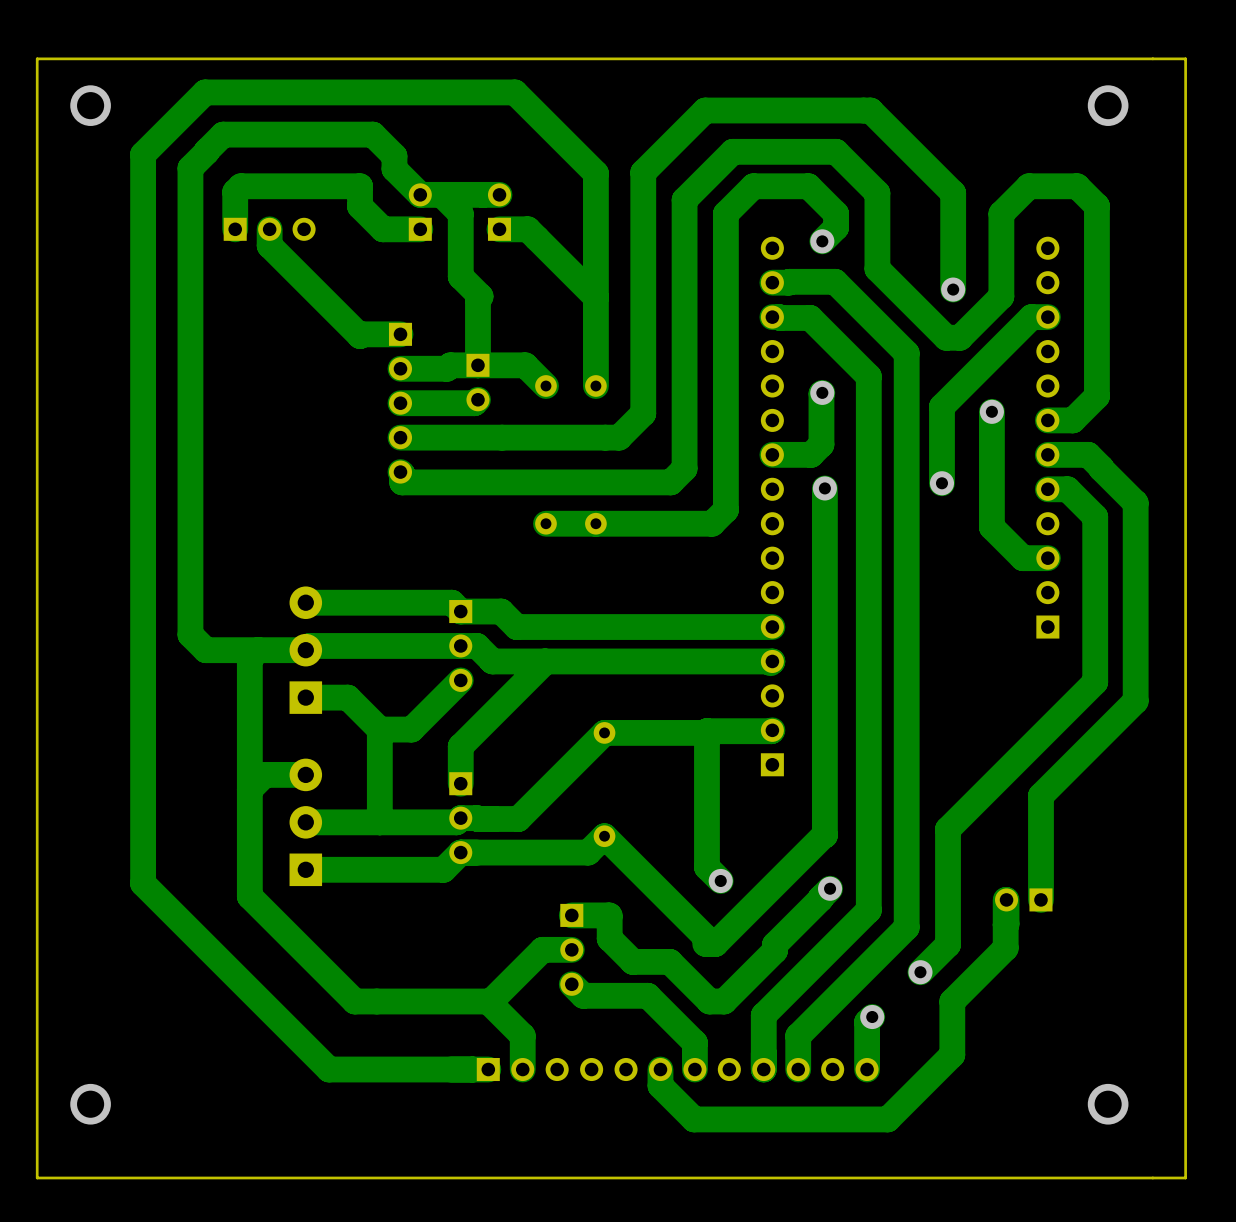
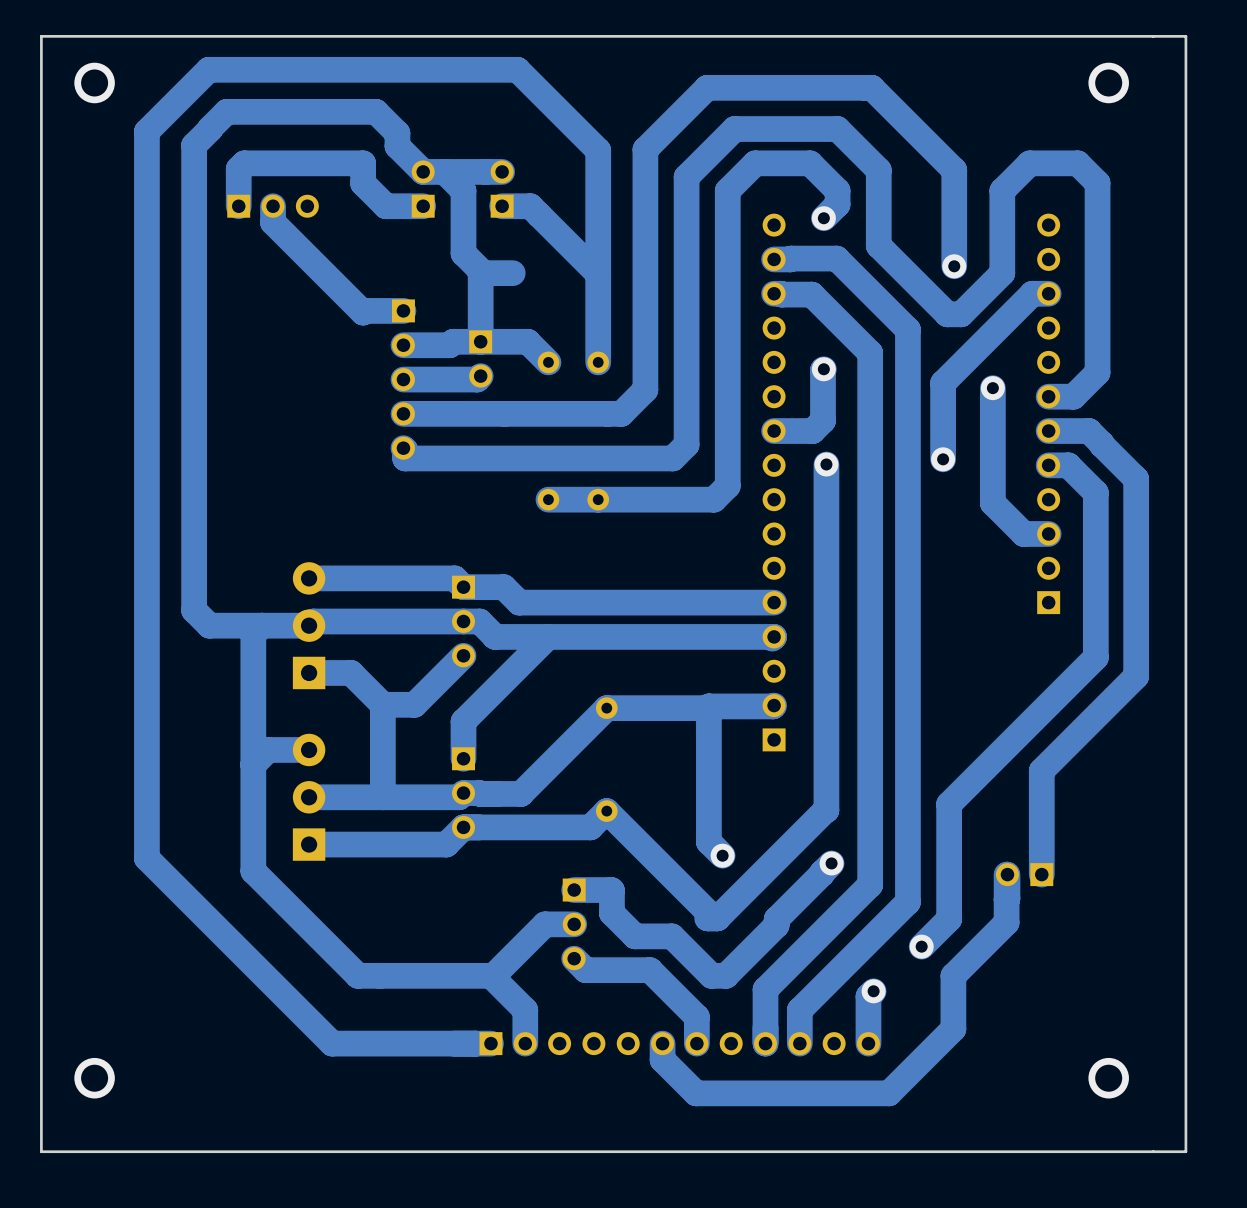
bottom track: none -> (512, 273) (483, 273)

